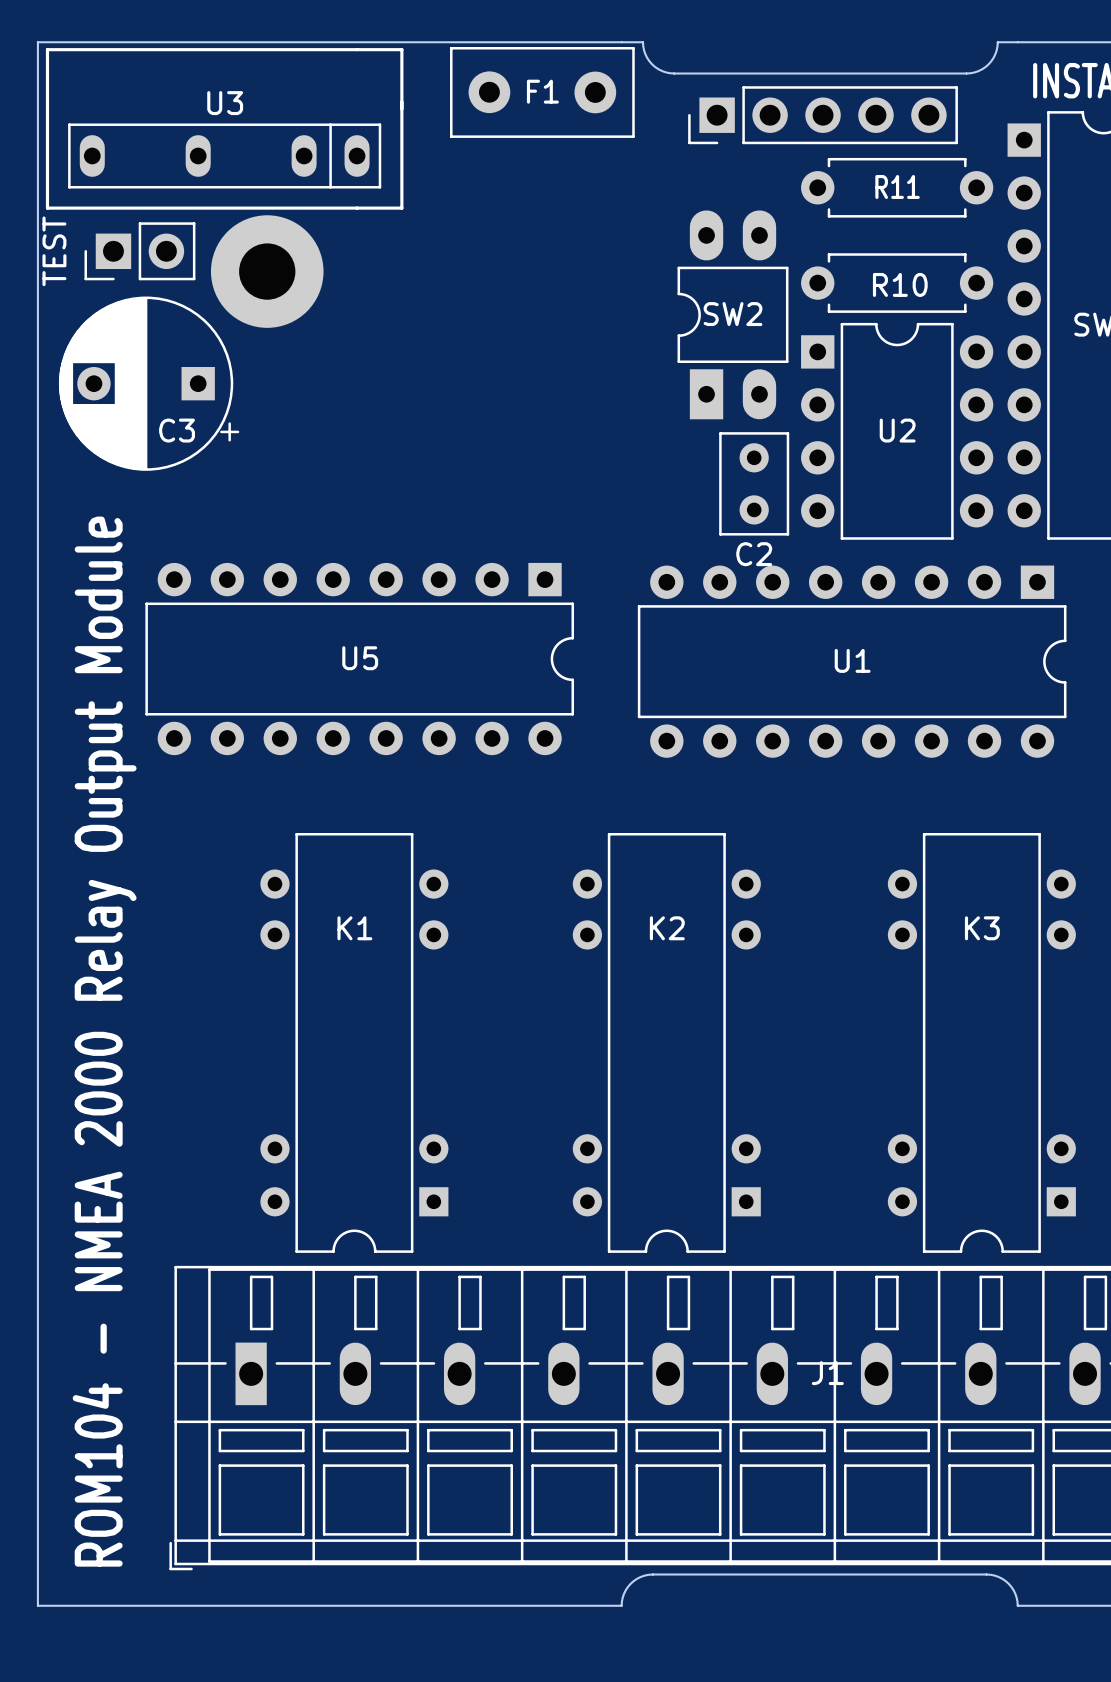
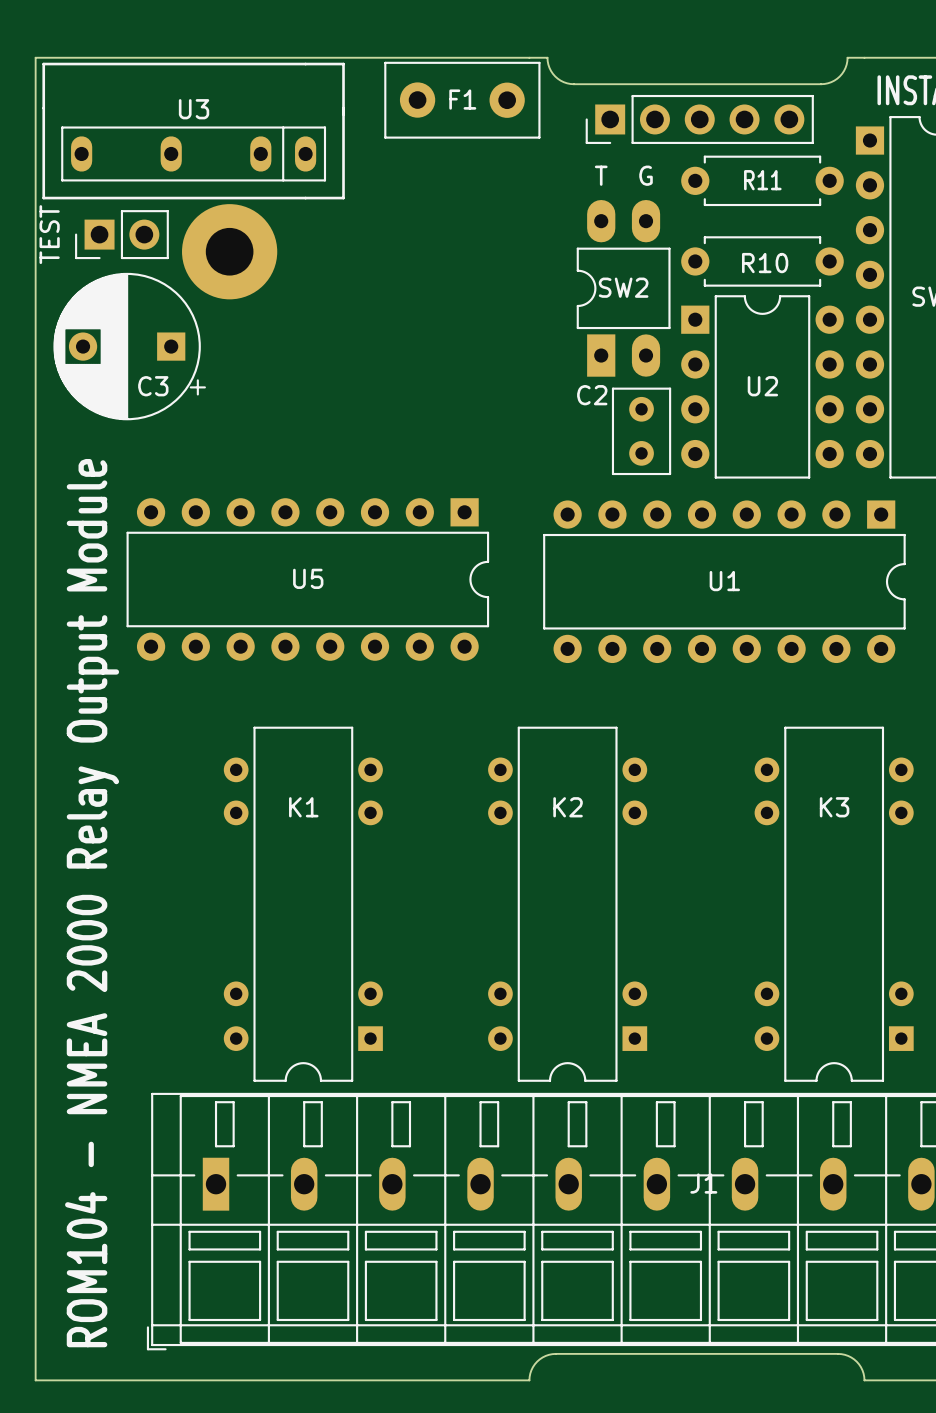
text: none -> T (601, 175)
text: none -> G (646, 175)
C2 name position: C2 (754, 554) -> C2 (592, 395)

